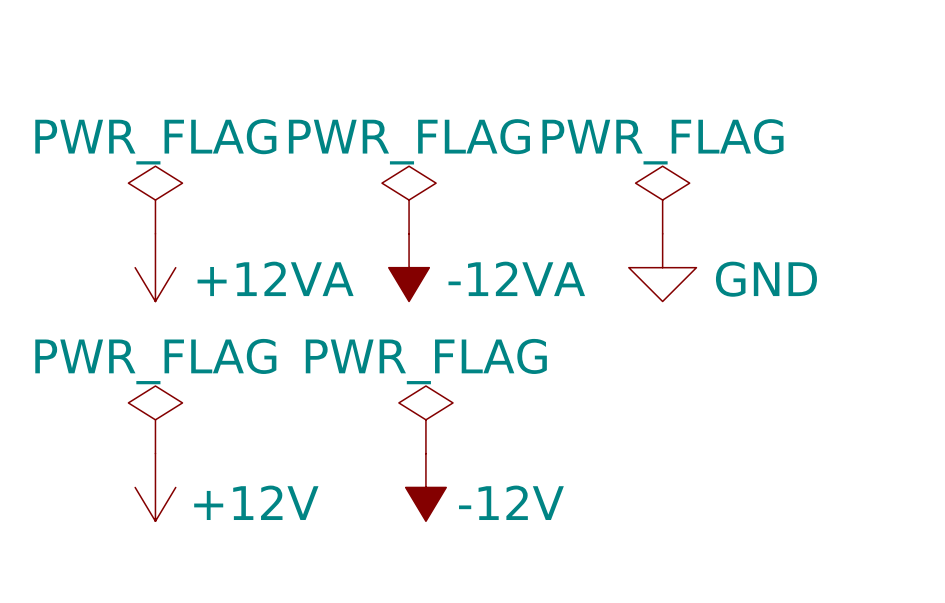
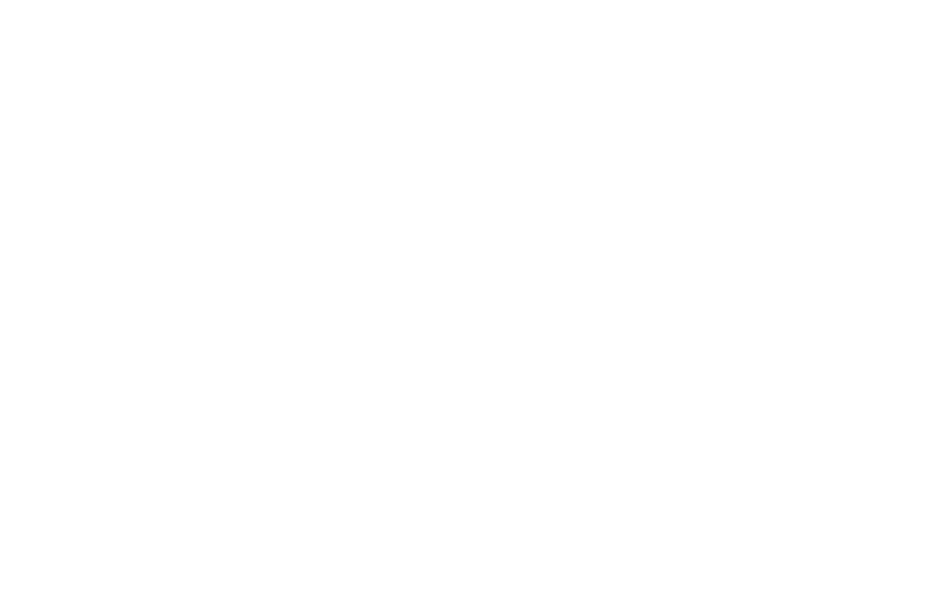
power symbol: PWR_FLAG (155, 200) -> none
power symbol: PWR_FLAG (409, 200) -> none
power symbol: PWR_FLAG (662, 200) -> none
power symbol: +12VA (155, 267) -> none
power symbol: -12VA (409, 267) -> none
power symbol: GND (662, 267) -> none
power symbol: PWR_FLAG (155, 419) -> none
power symbol: PWR_FLAG (425, 419) -> none
power symbol: +12V (155, 487) -> none
power symbol: -12V (425, 487) -> none

